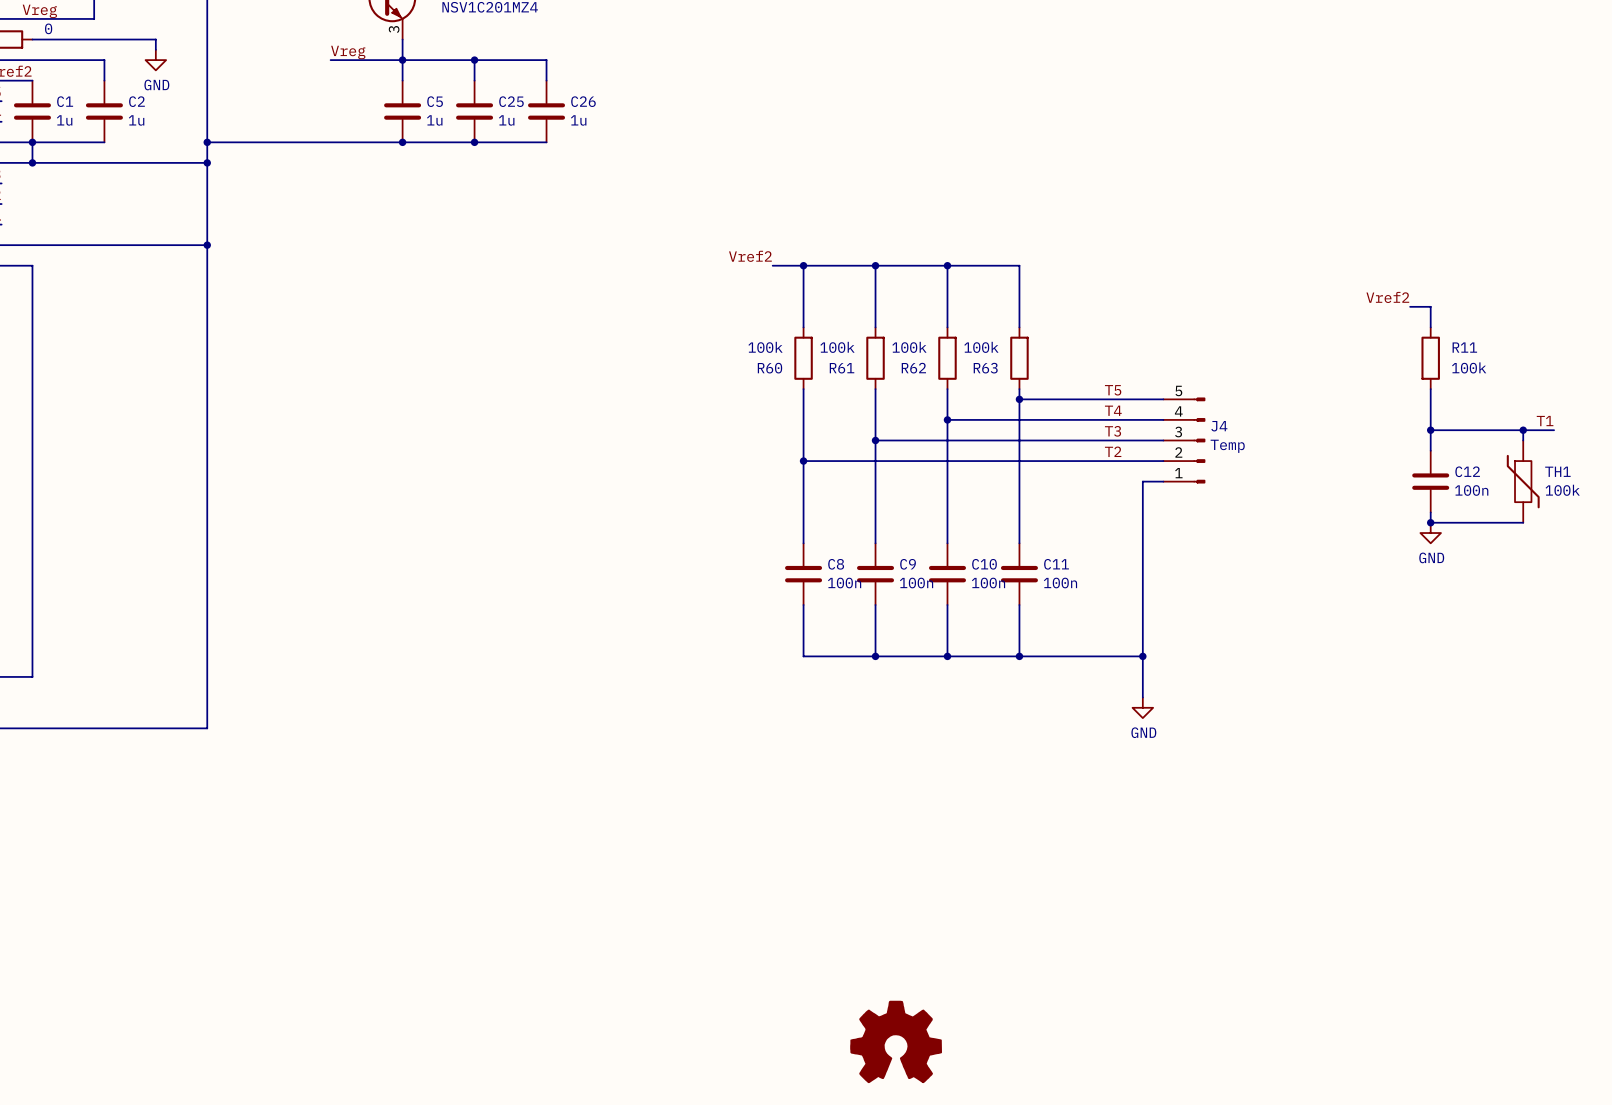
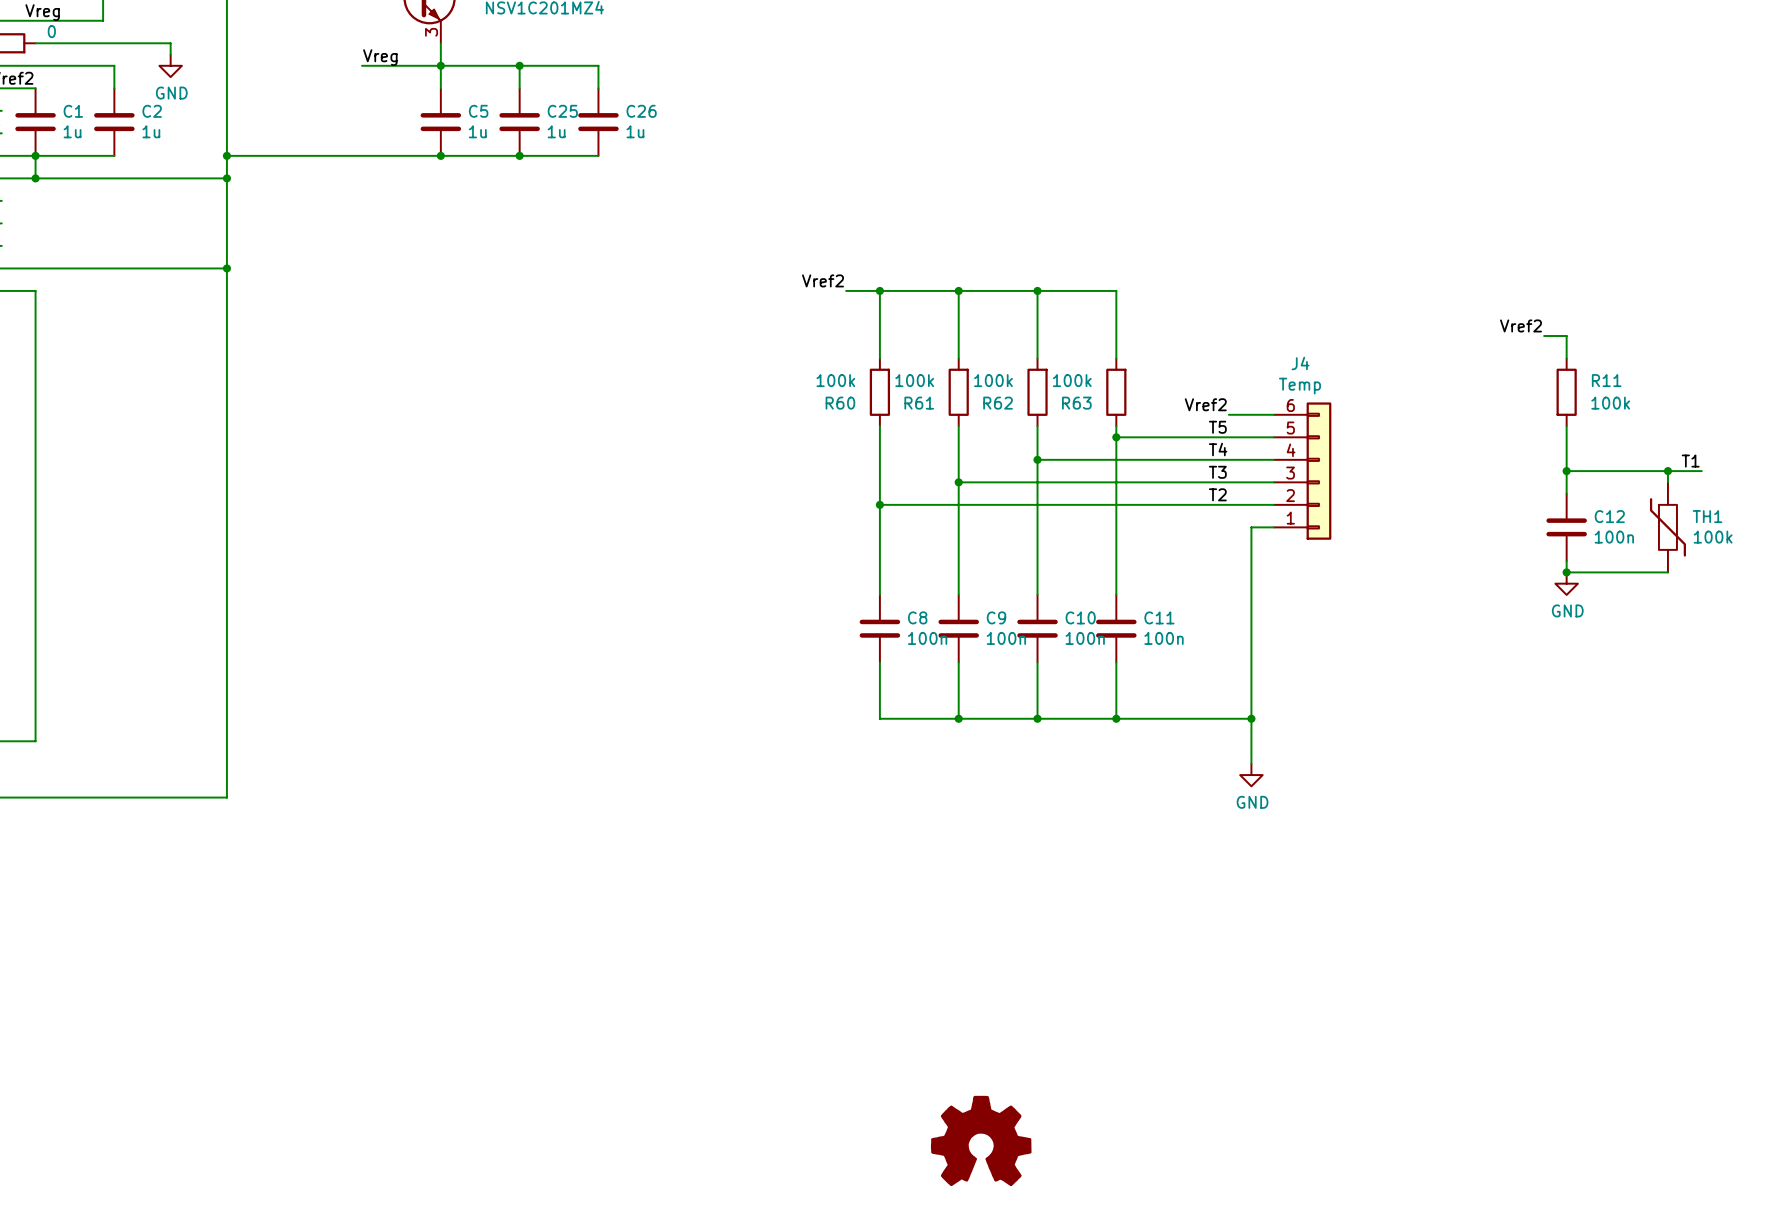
label: none -> Vref2 (1205, 404)
wire: none -> (1228, 414) (1273, 414)
J4 symbol: [1163, 397, 1206, 484] -> [1273, 402, 1332, 540]
J4 name position: J4 (1219, 426) -> J4 (1300, 363)
J4 value position: Temp (1227, 446) -> Temp (1299, 386)

